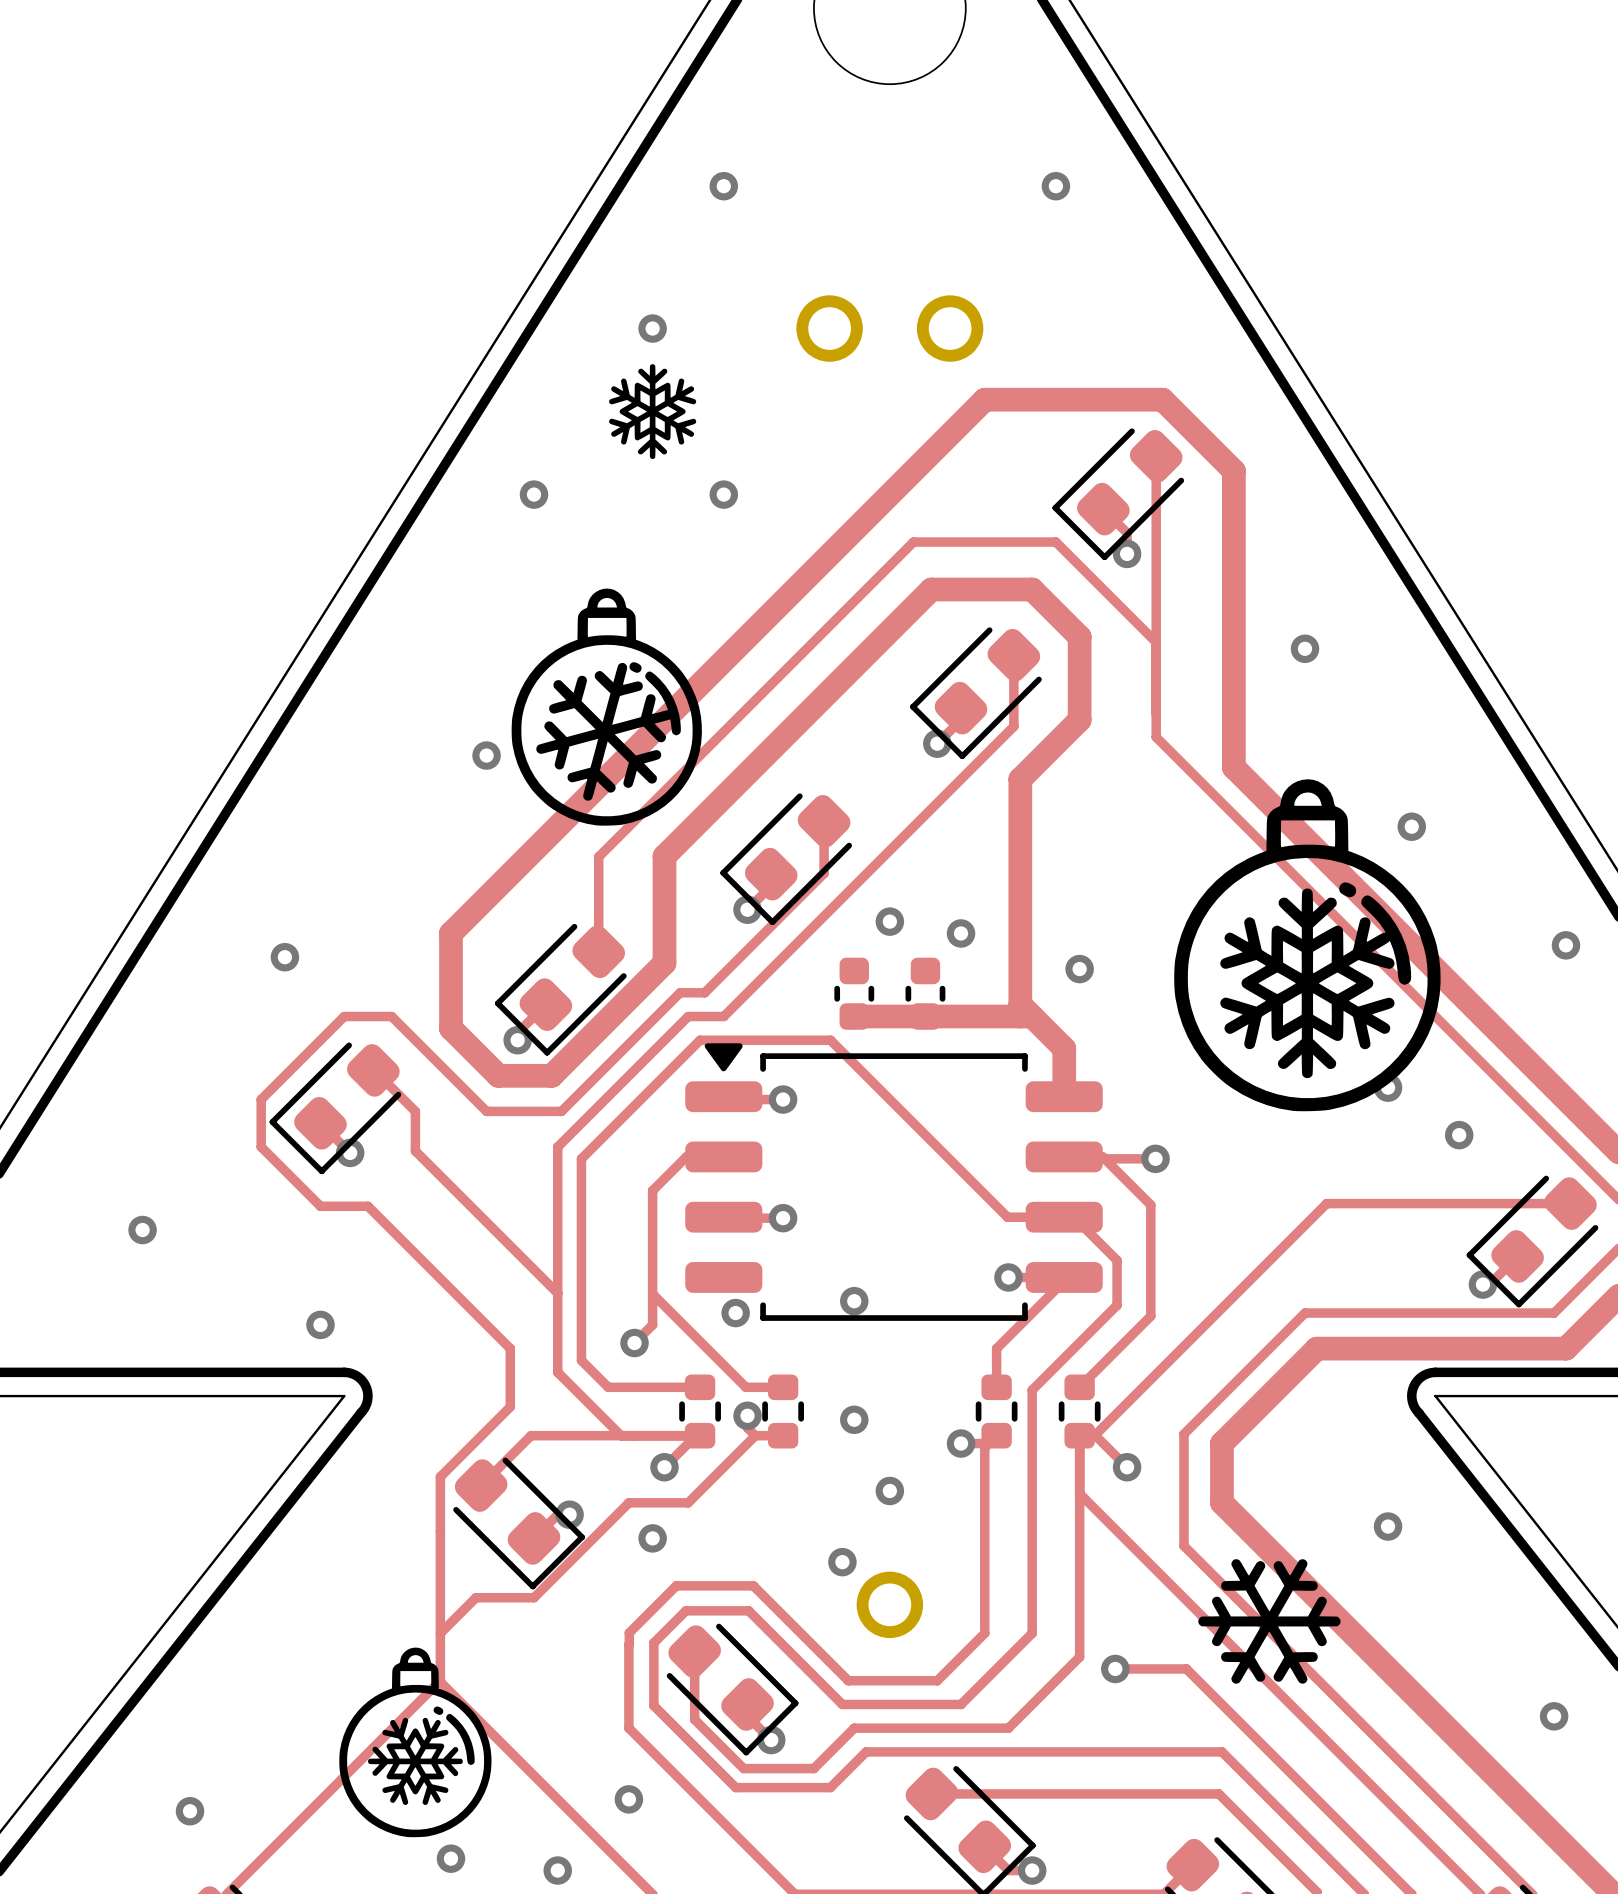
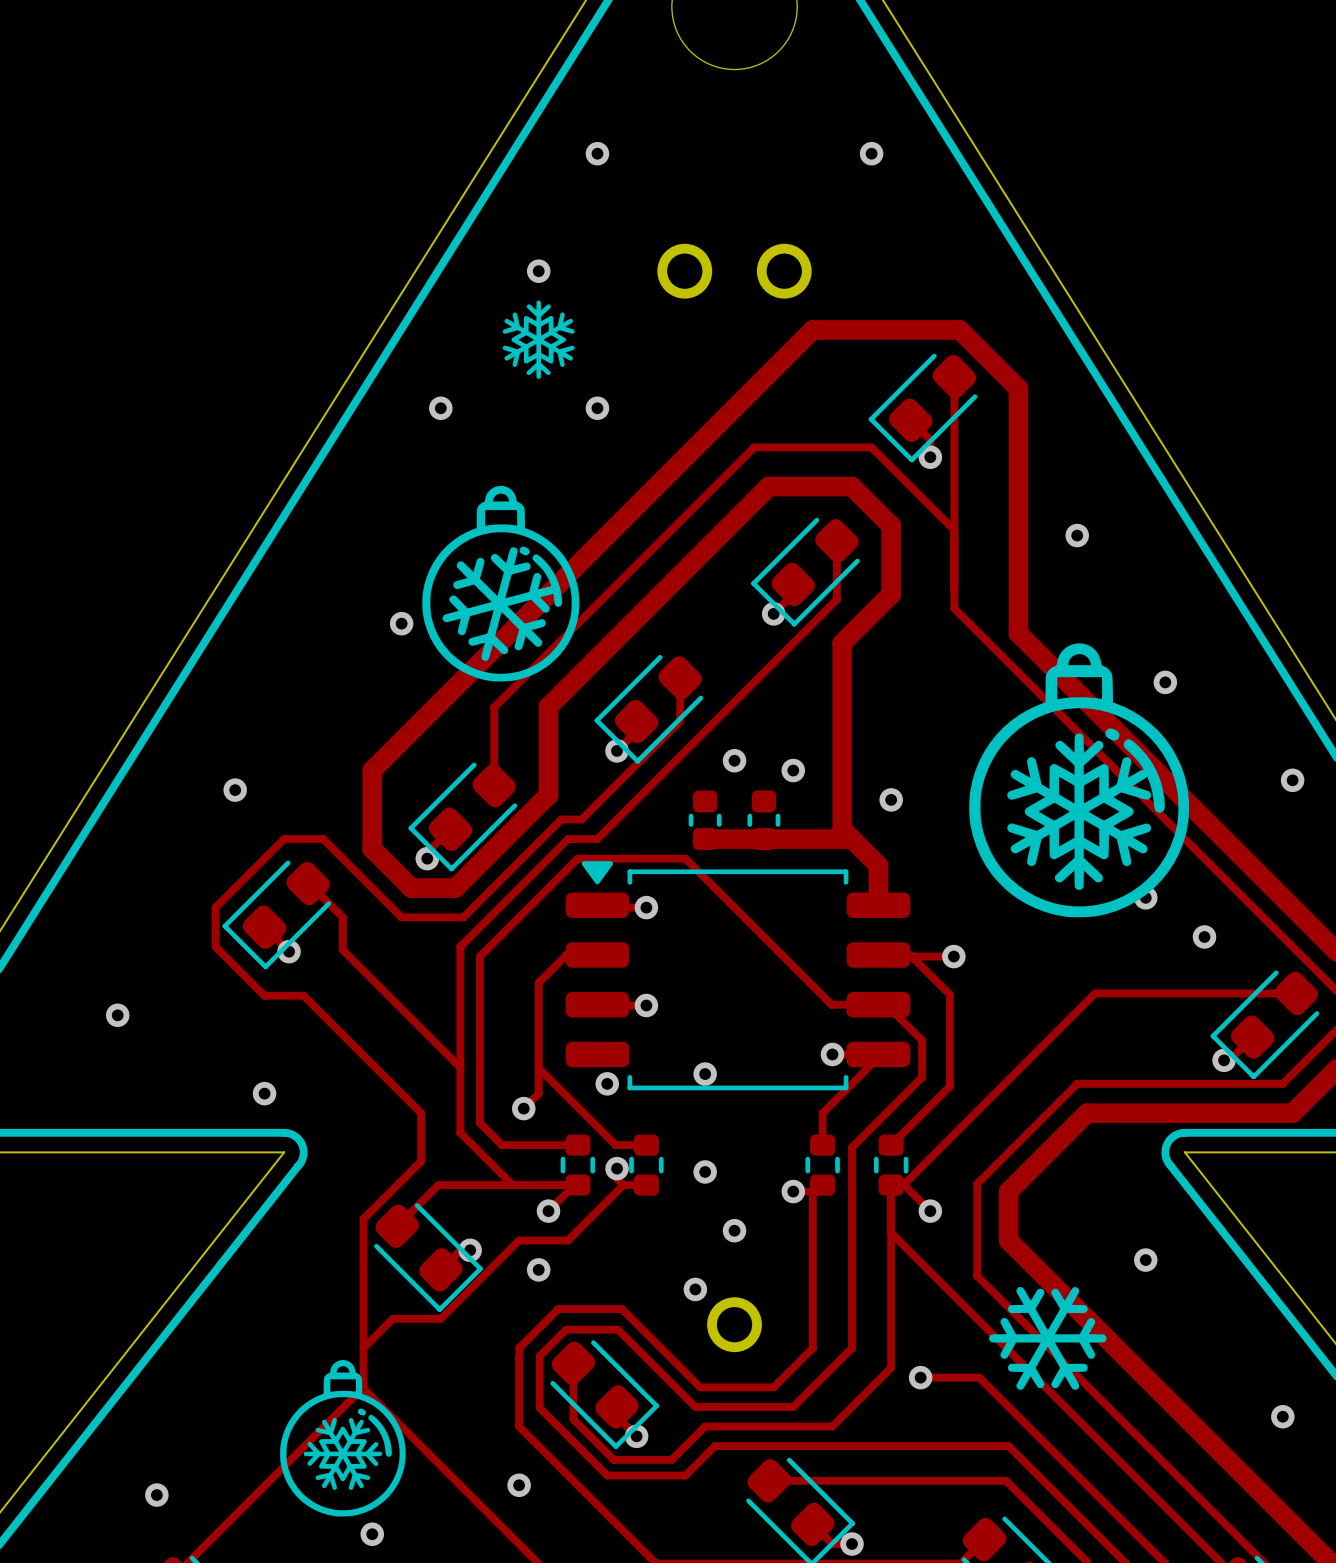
via: (557, 1870) -> none

